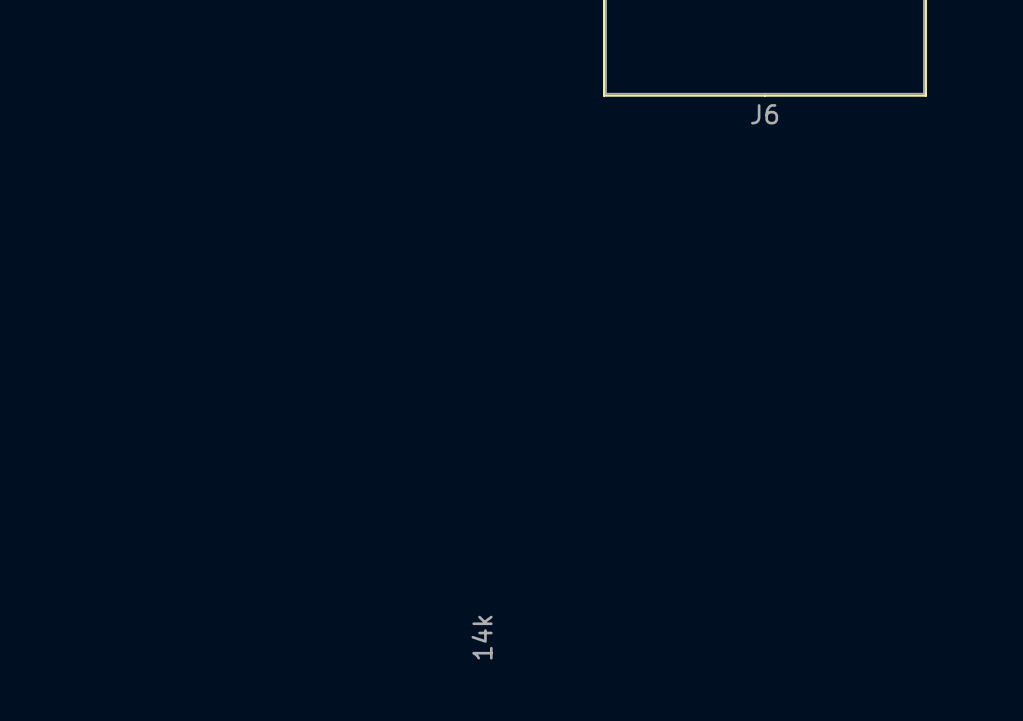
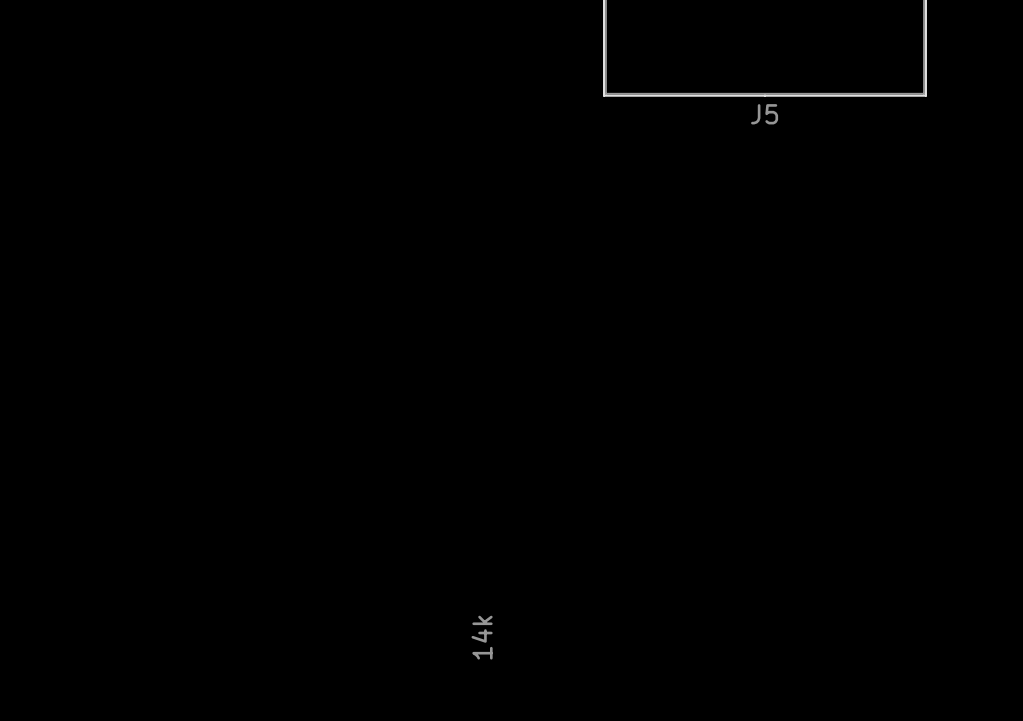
J6 name: J6 (764, 114) -> J5 (764, 114)

